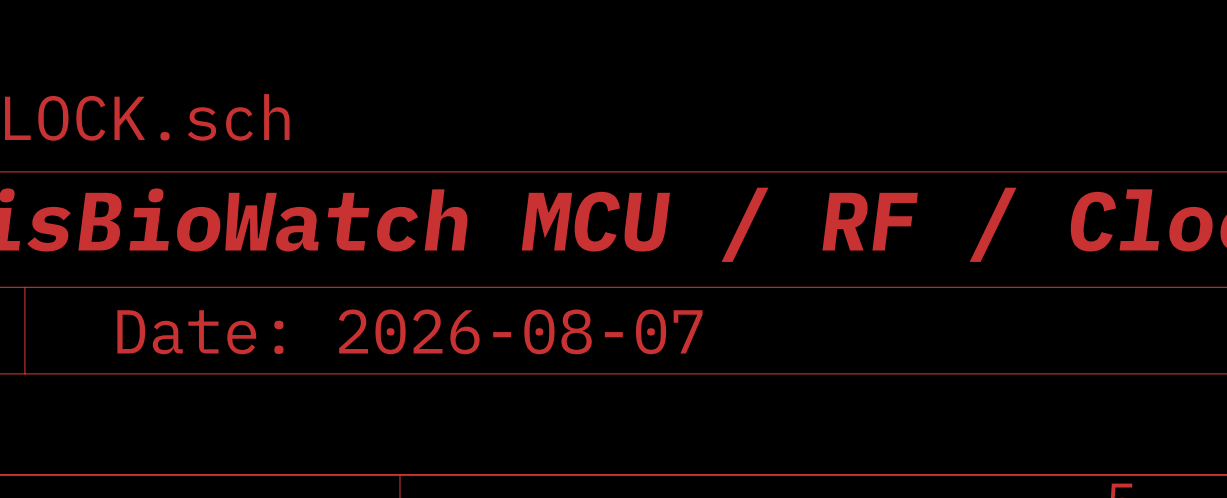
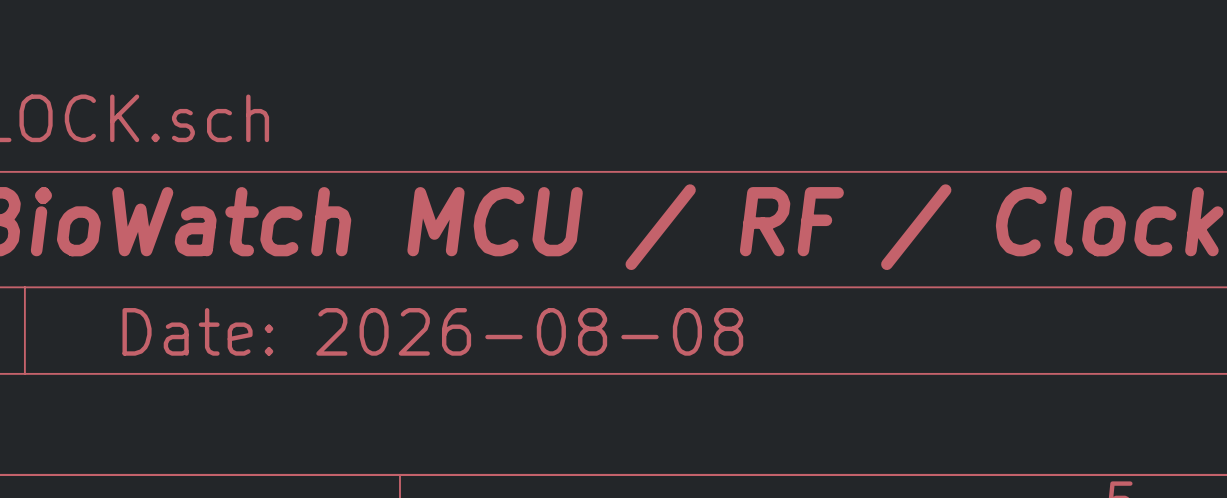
title block: Date: 2026-08-07 (409, 331) -> Date: 2026-08-08 (432, 331)

